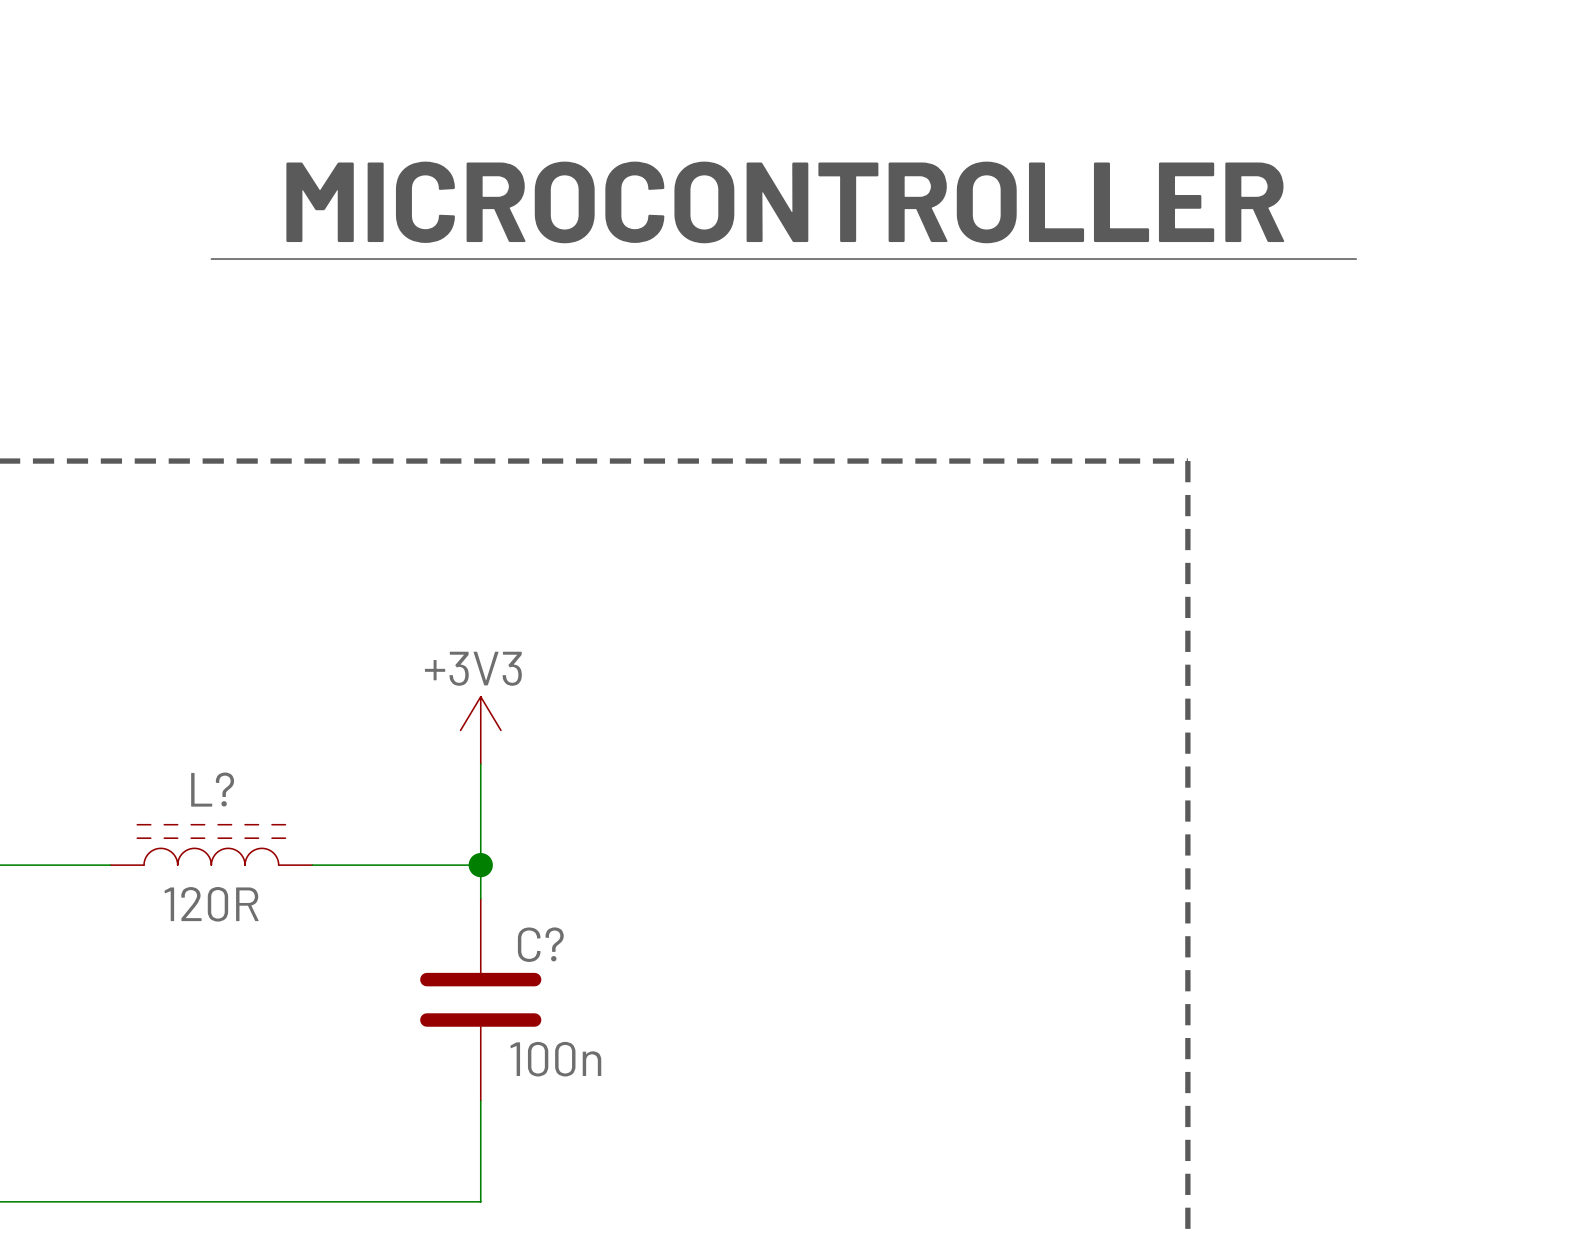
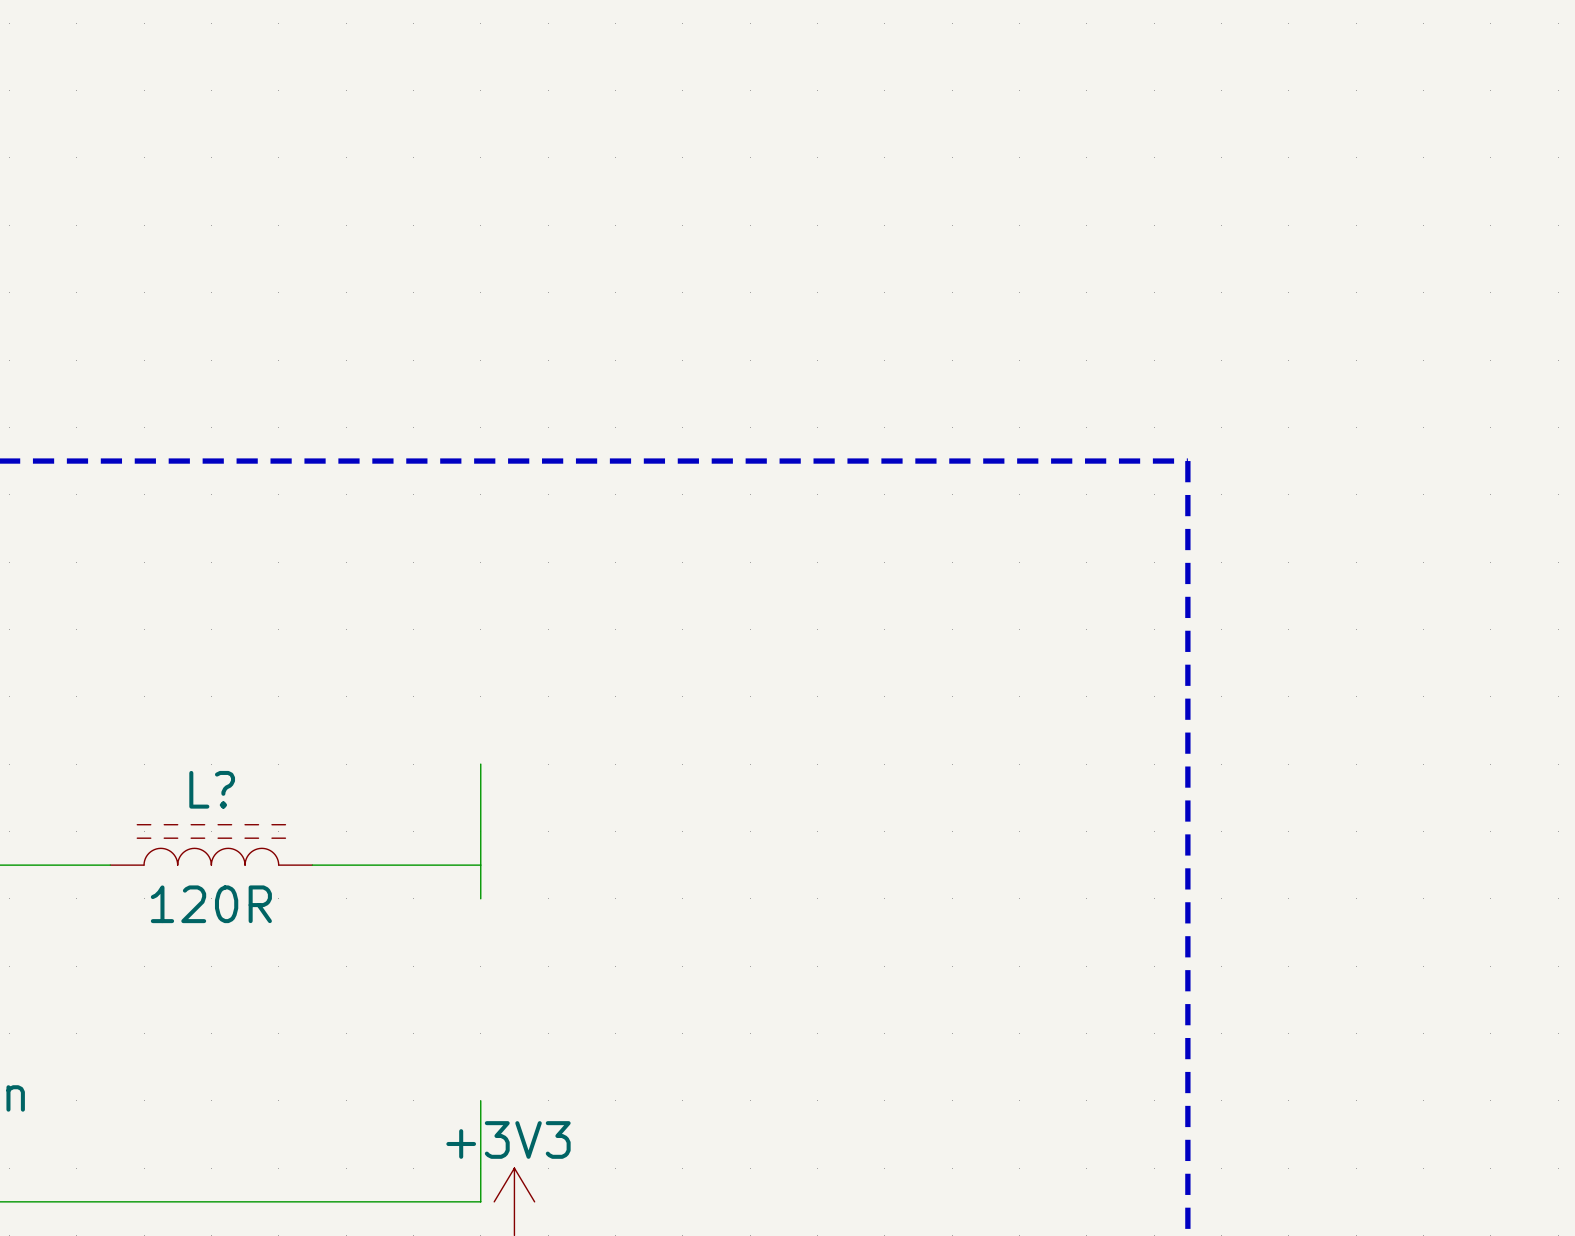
text: MICROCONTROLLER (785, 202) -> none
line: (211, 259) (1356, 259) -> none
power symbol position: +3V3 (480, 730) -> +3V3 (514, 1201)
junction: (480, 865) -> none
C?: 100n (480, 999) -> none

